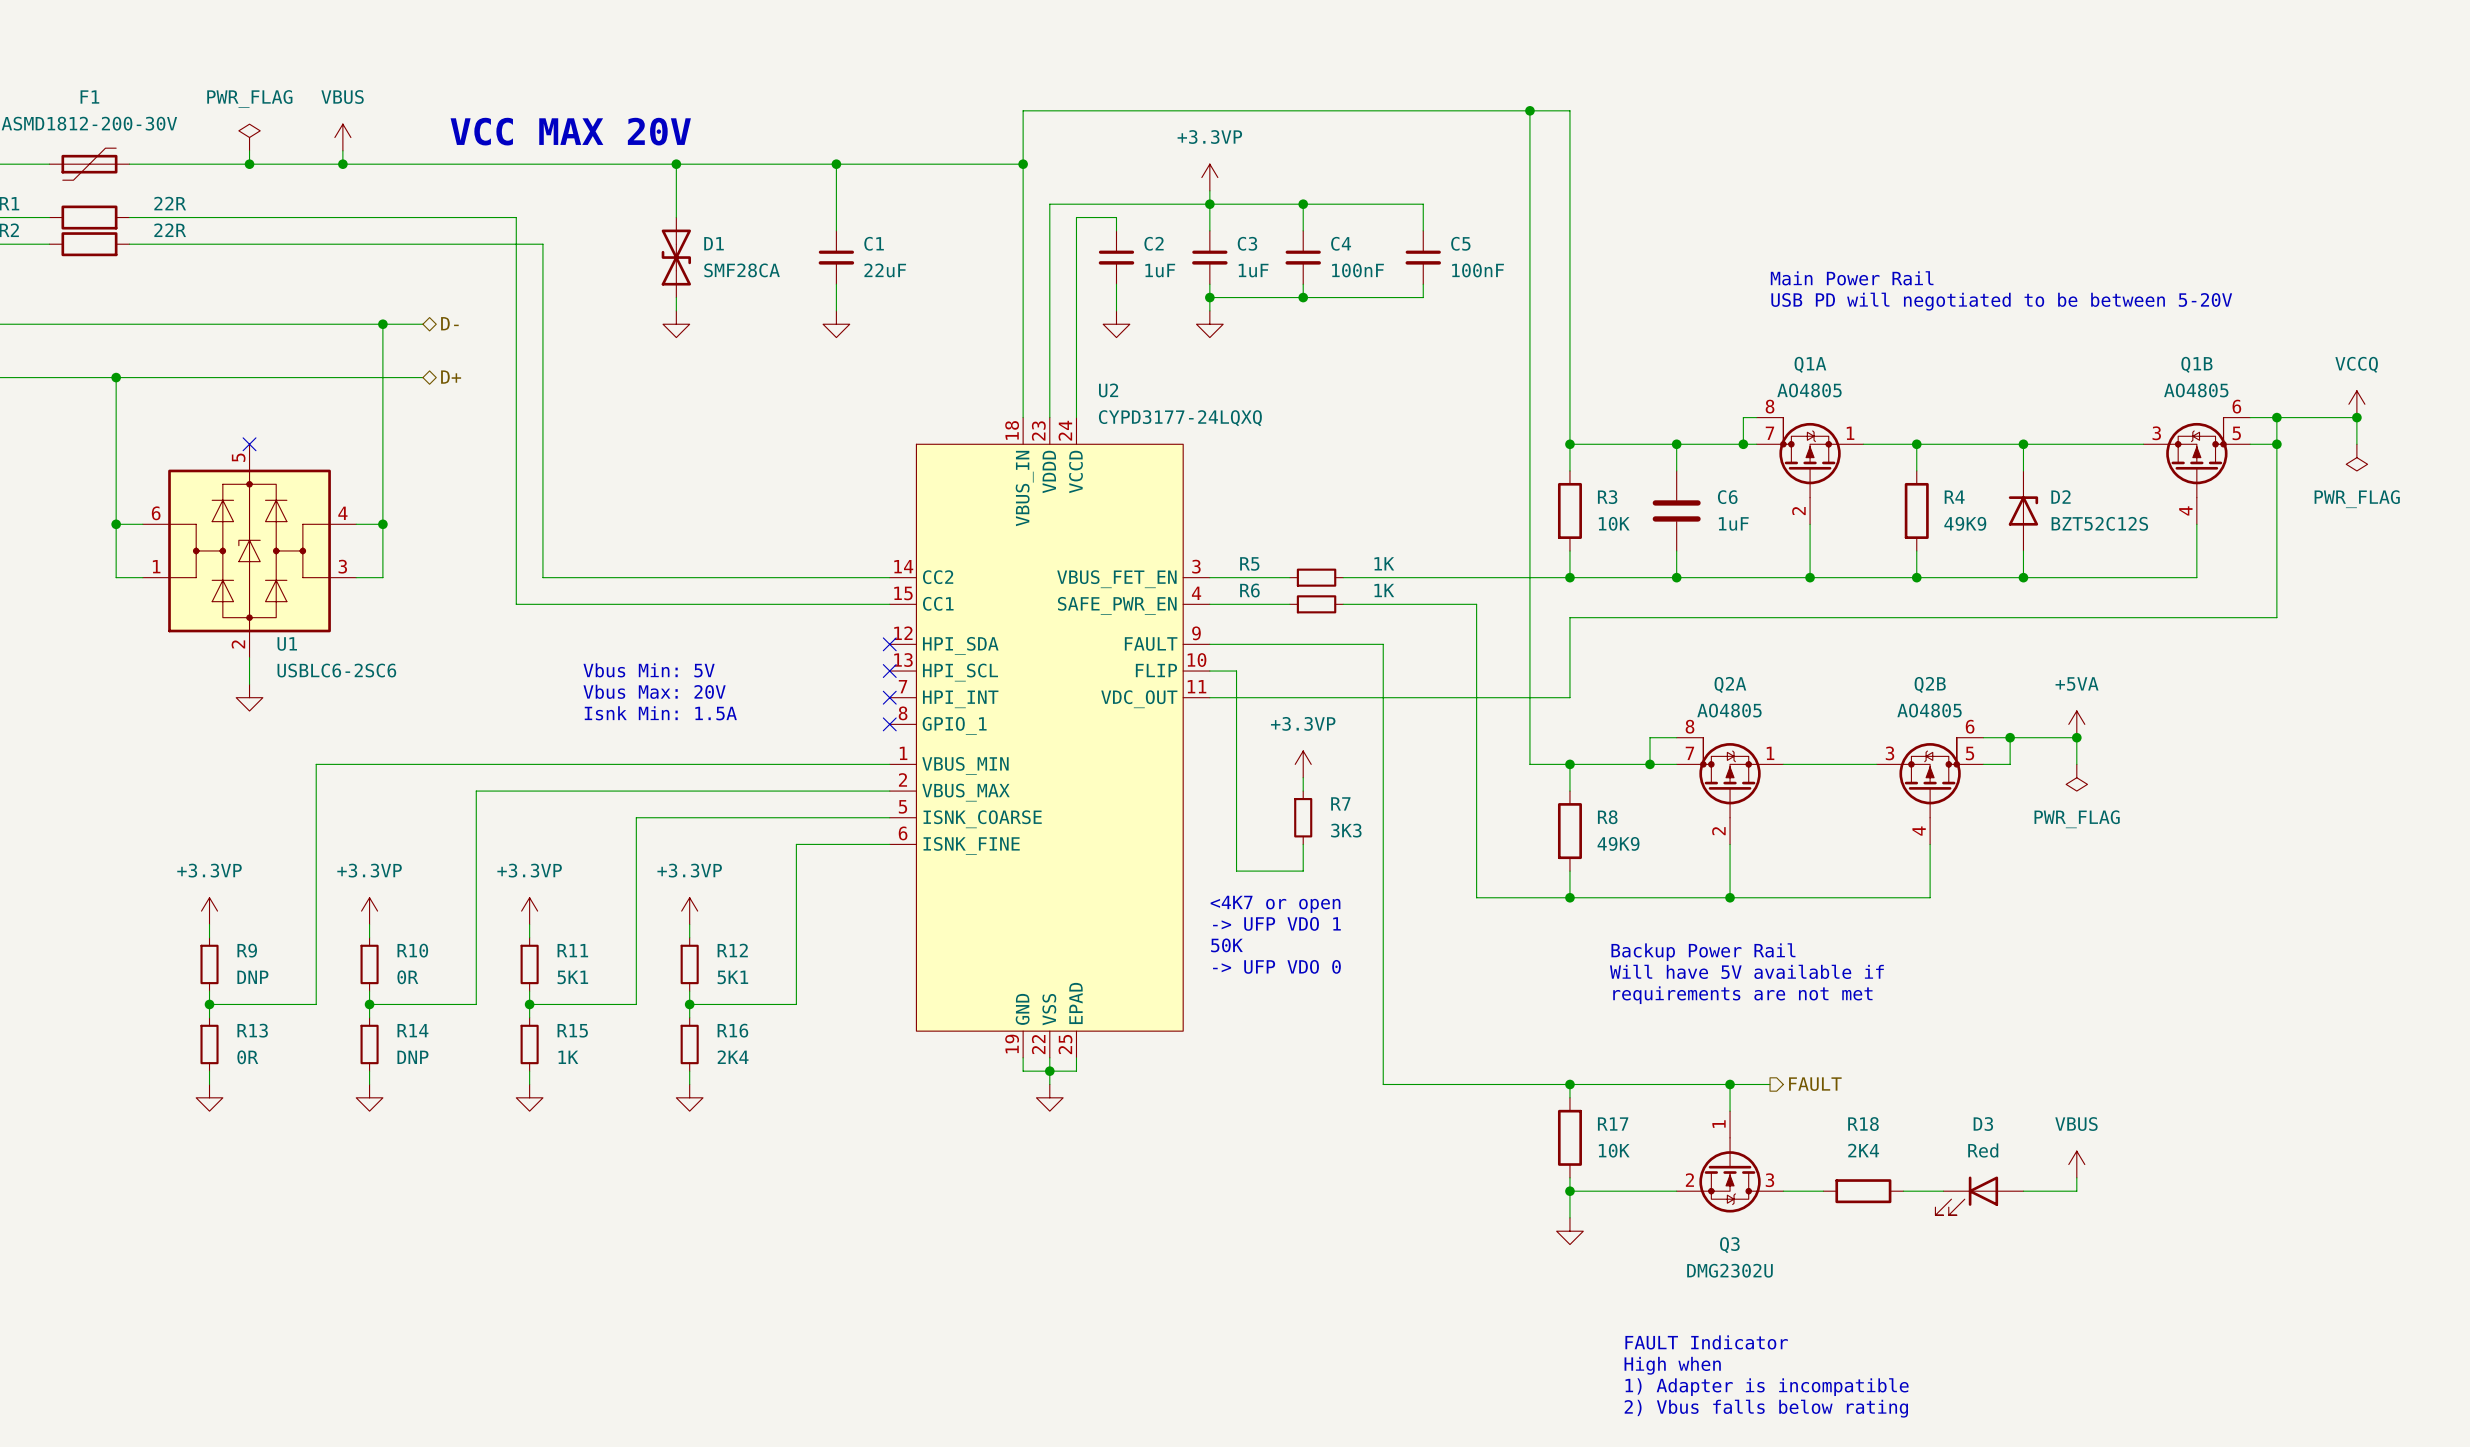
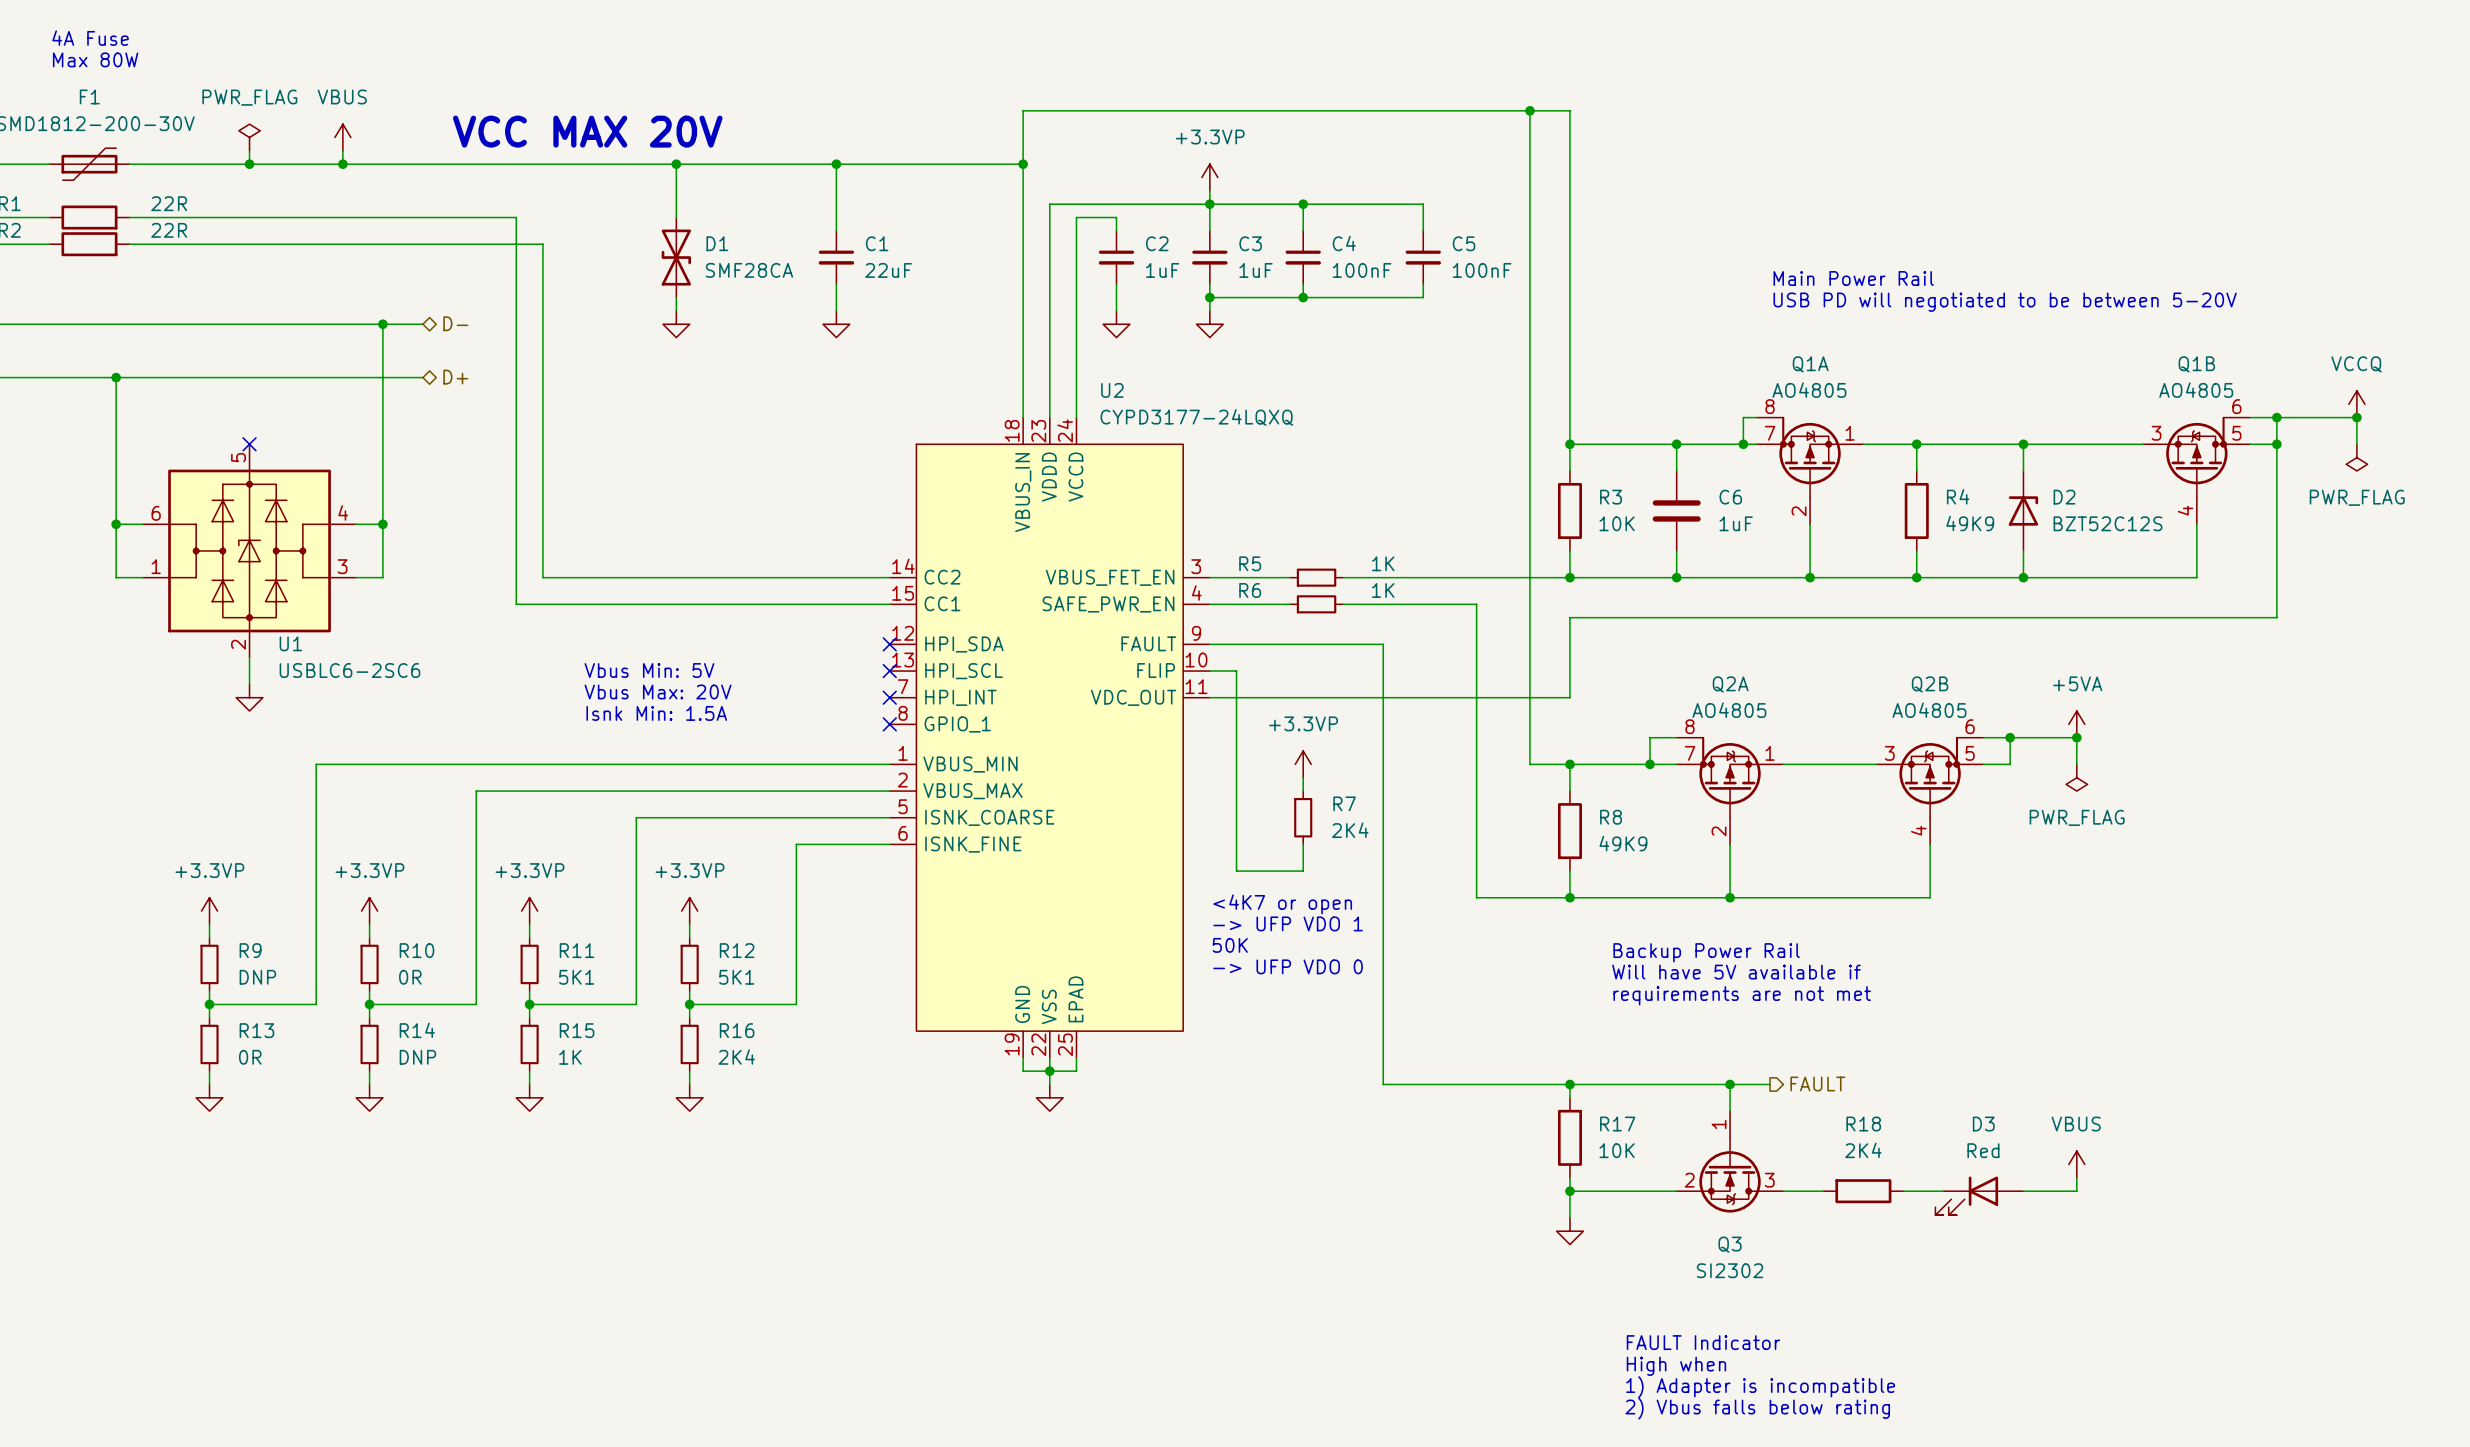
text: none -> 4A Fuse (90, 38)
text: none -> Max 80W (95, 59)
R7 value: 3K3 (1346, 830) -> 2K4 (1350, 830)
Q3 value: DMG2302U (1729, 1270) -> SI2302 (1730, 1270)

